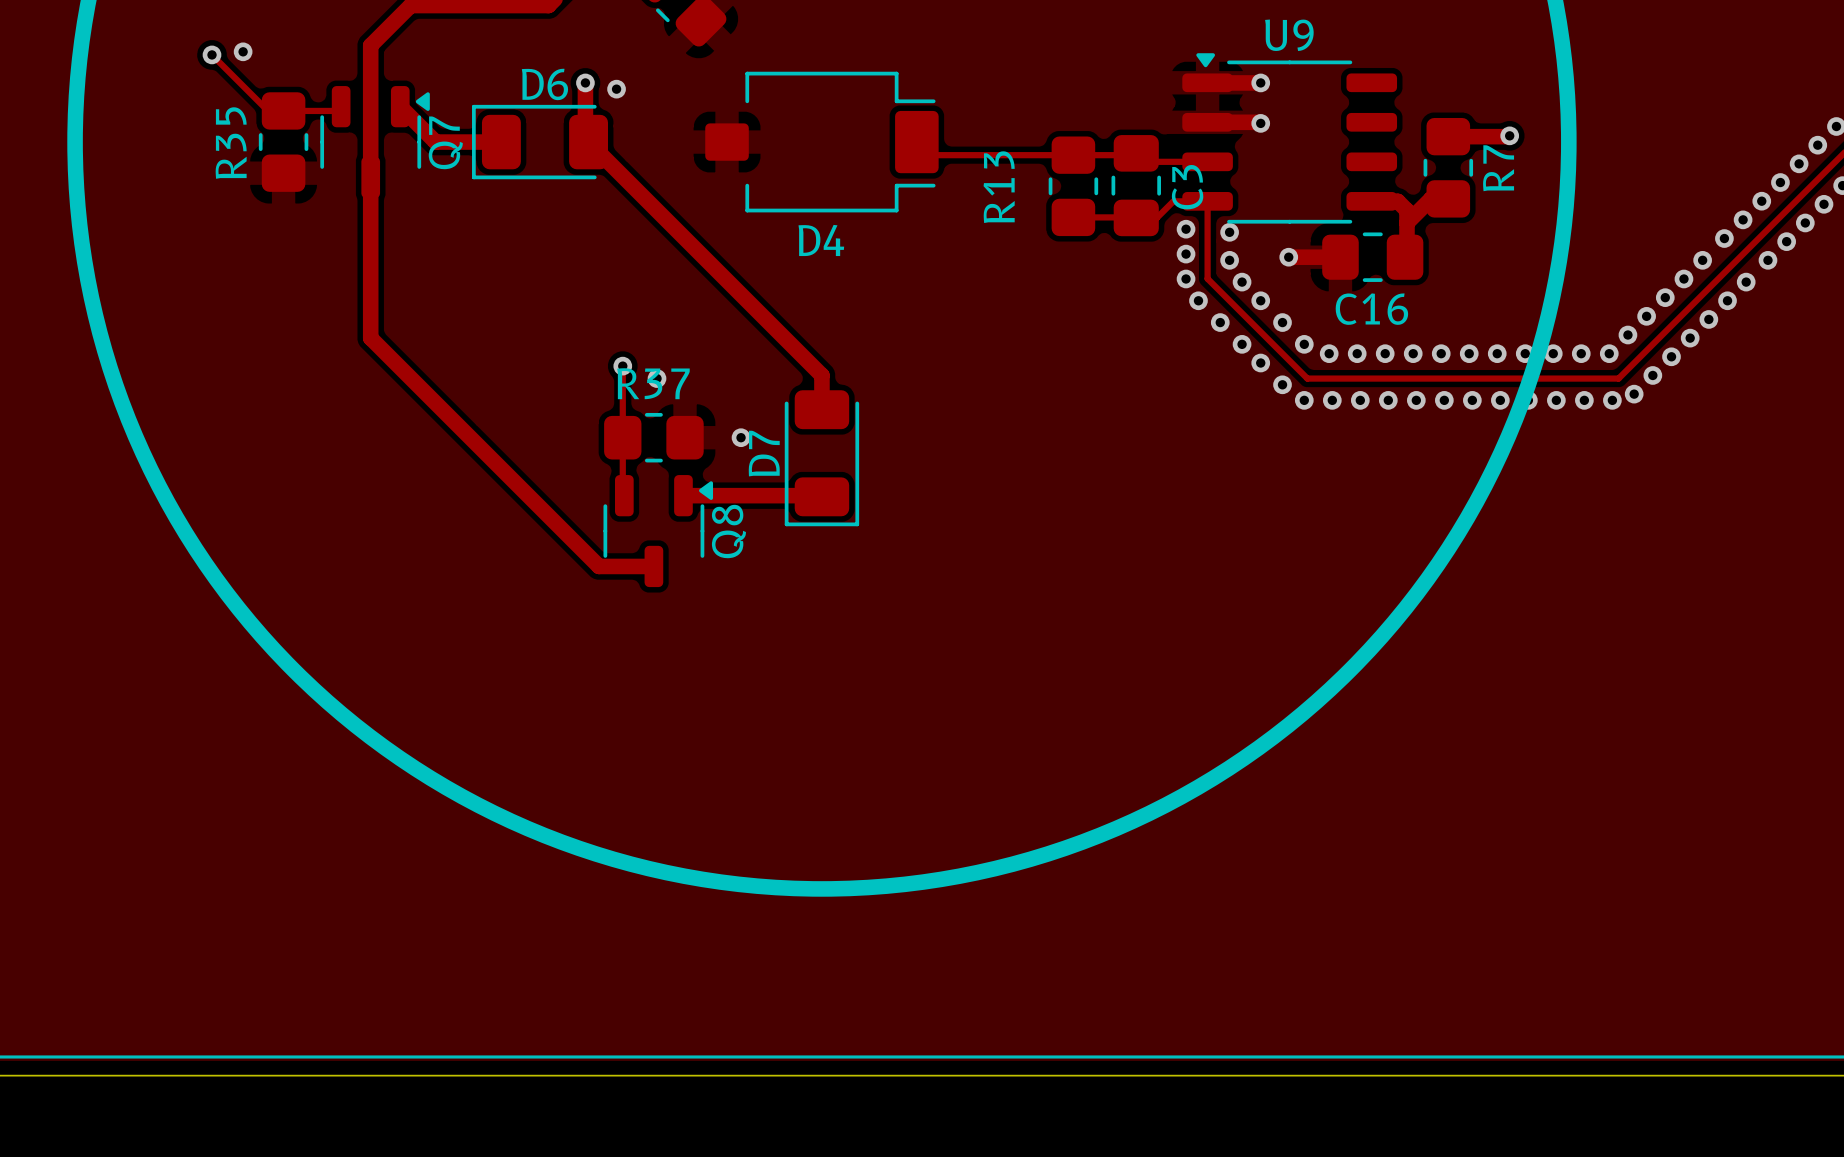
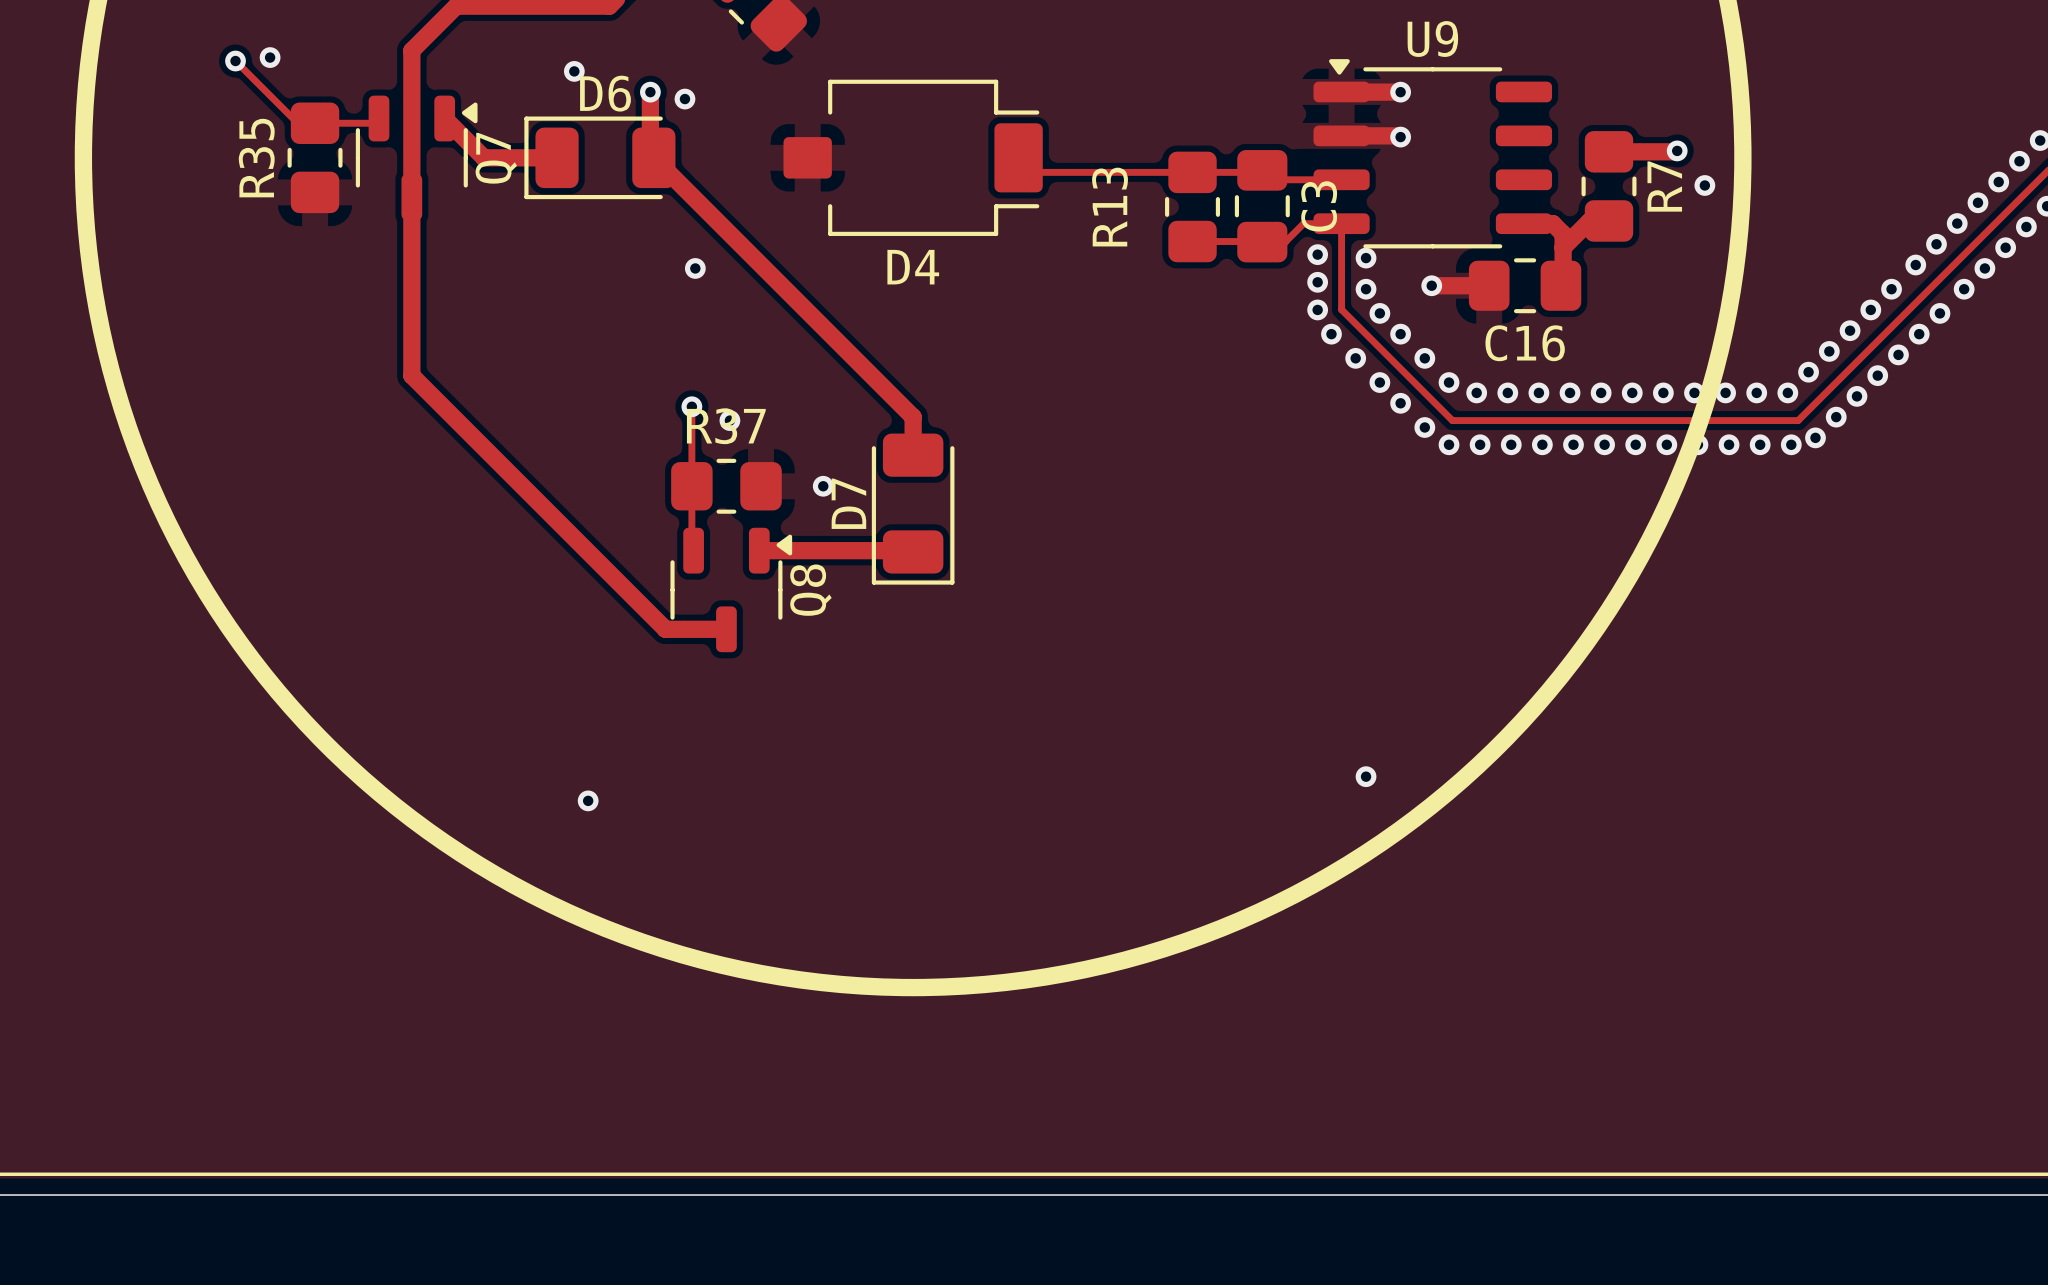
via: none -> (574, 71)
via: none -> (1704, 185)
via: none -> (695, 268)
via: none -> (1366, 776)
via: none -> (588, 800)

